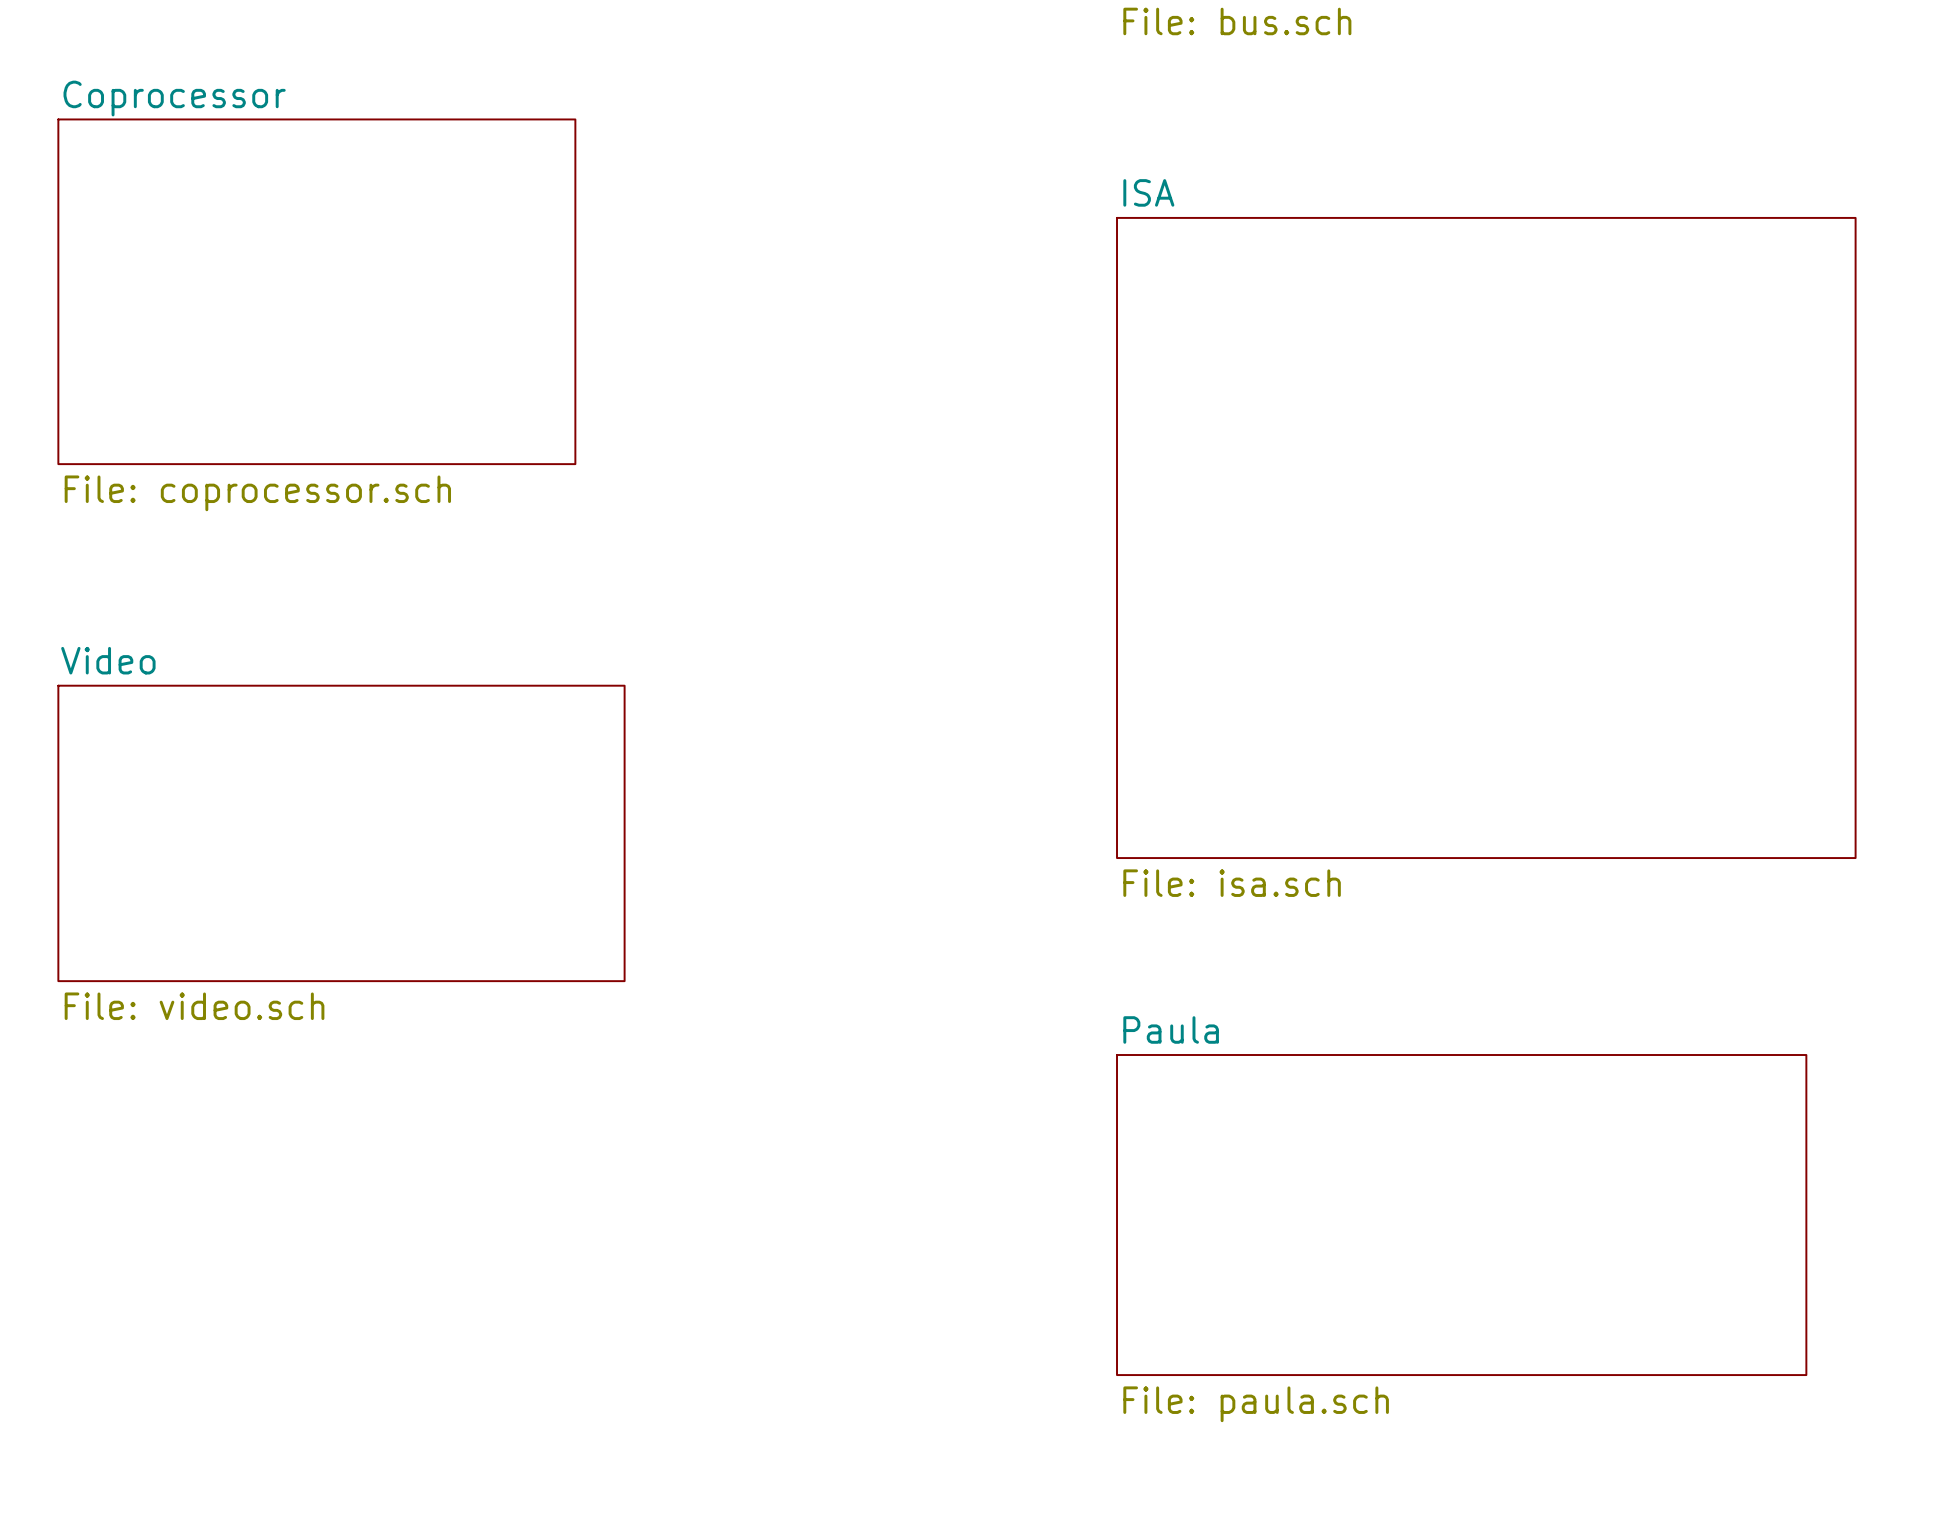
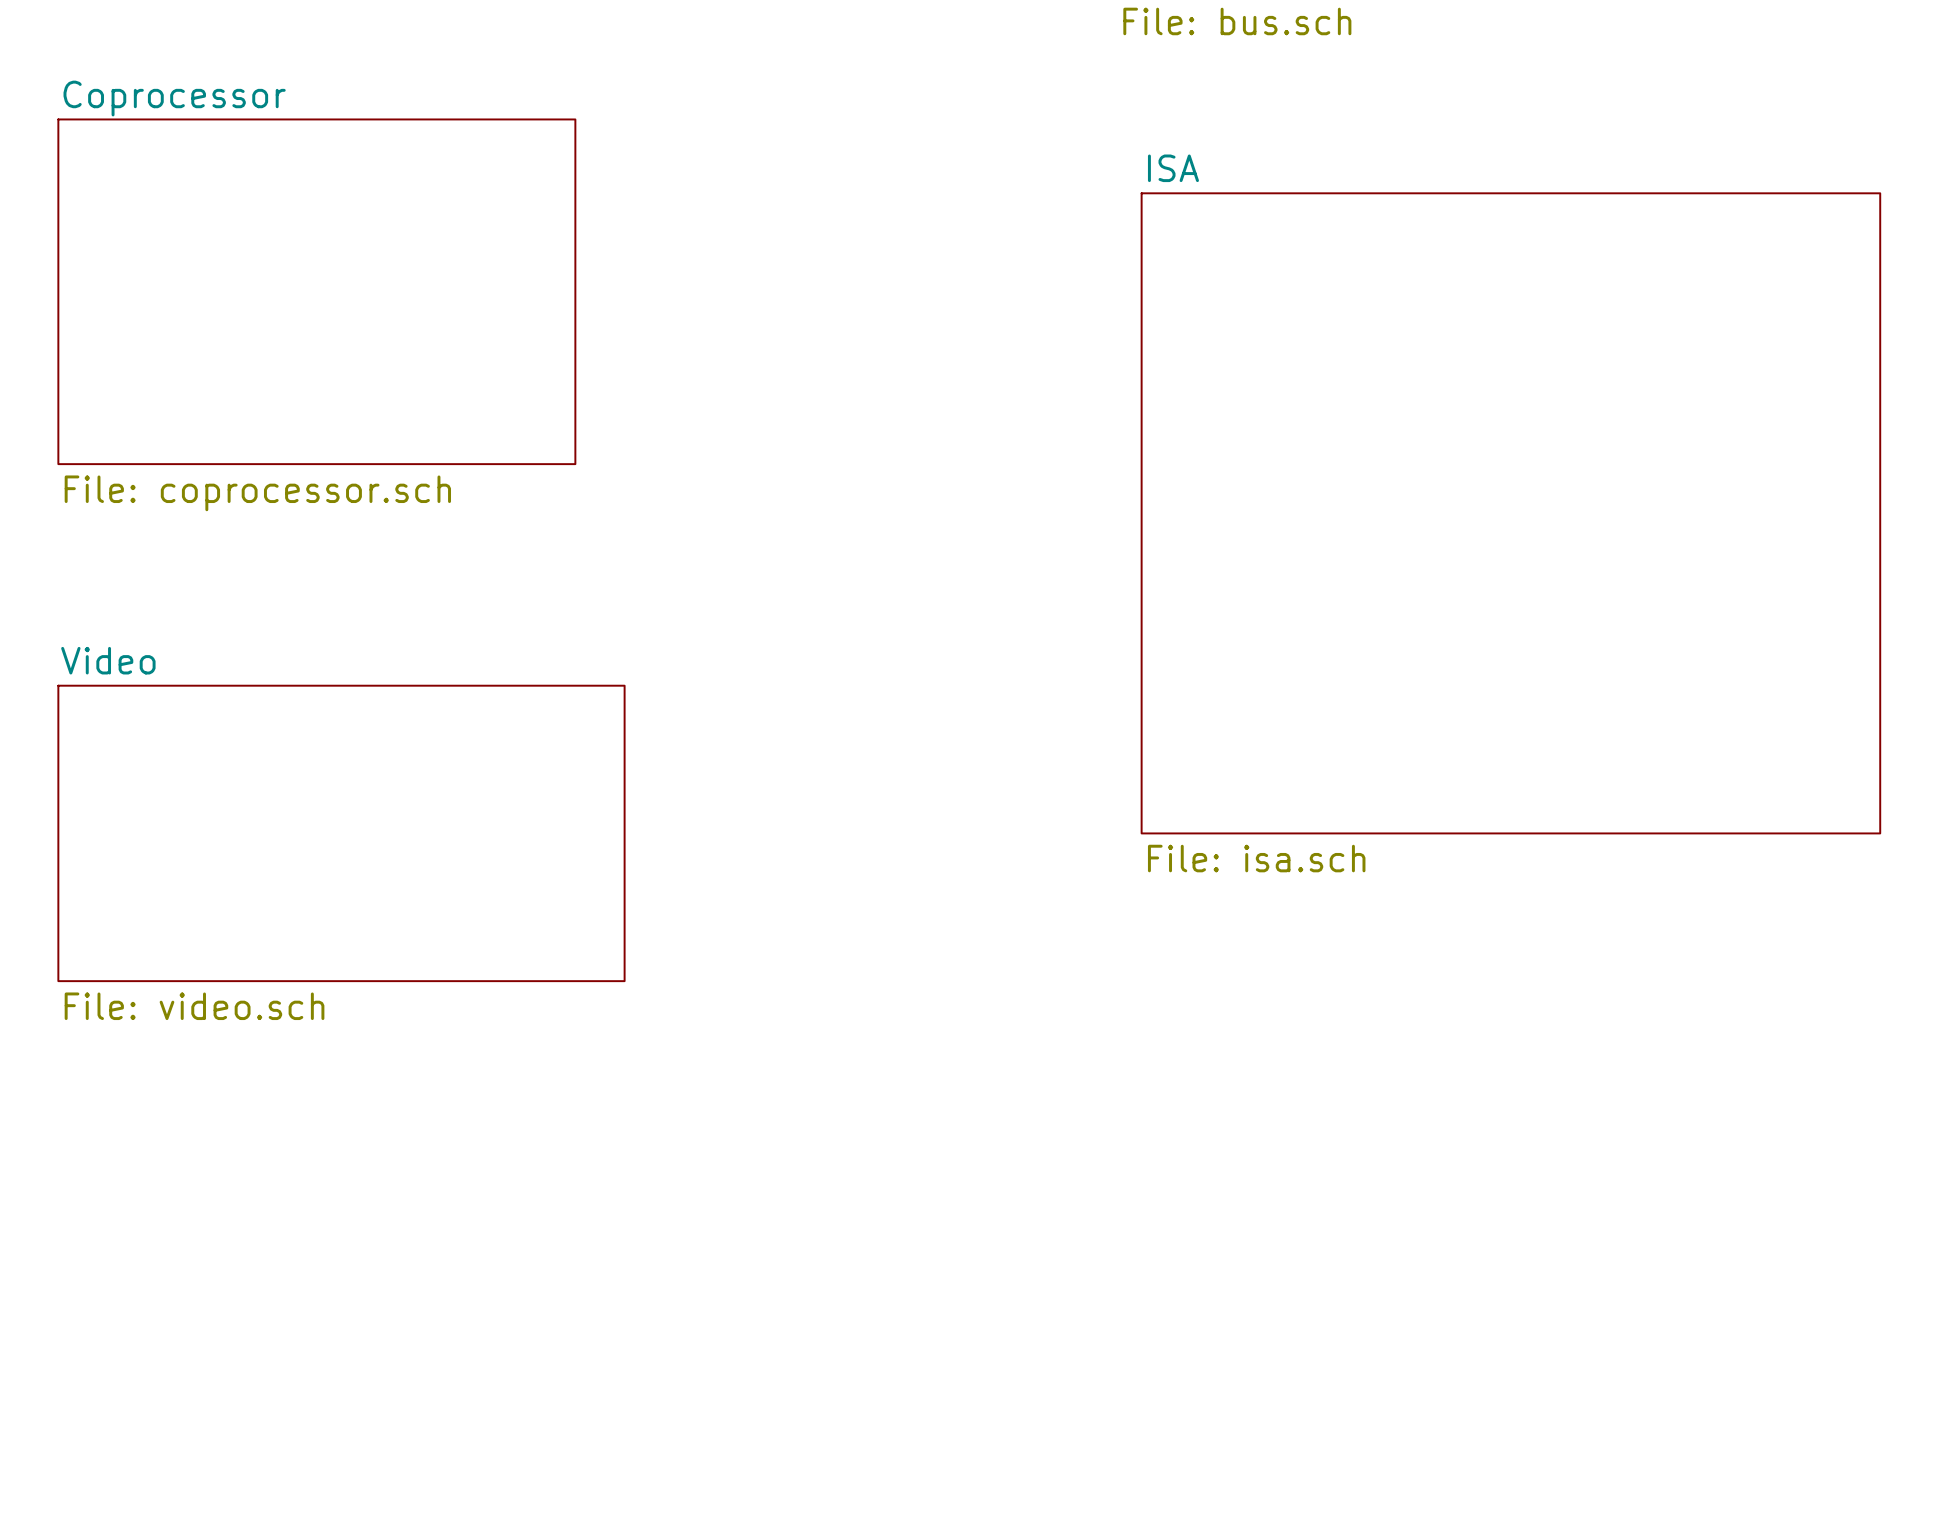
sheet ISA position: (1486, 537) -> (1510, 513)
sheet Paula: File: paula.sch (1461, 1215) -> none

